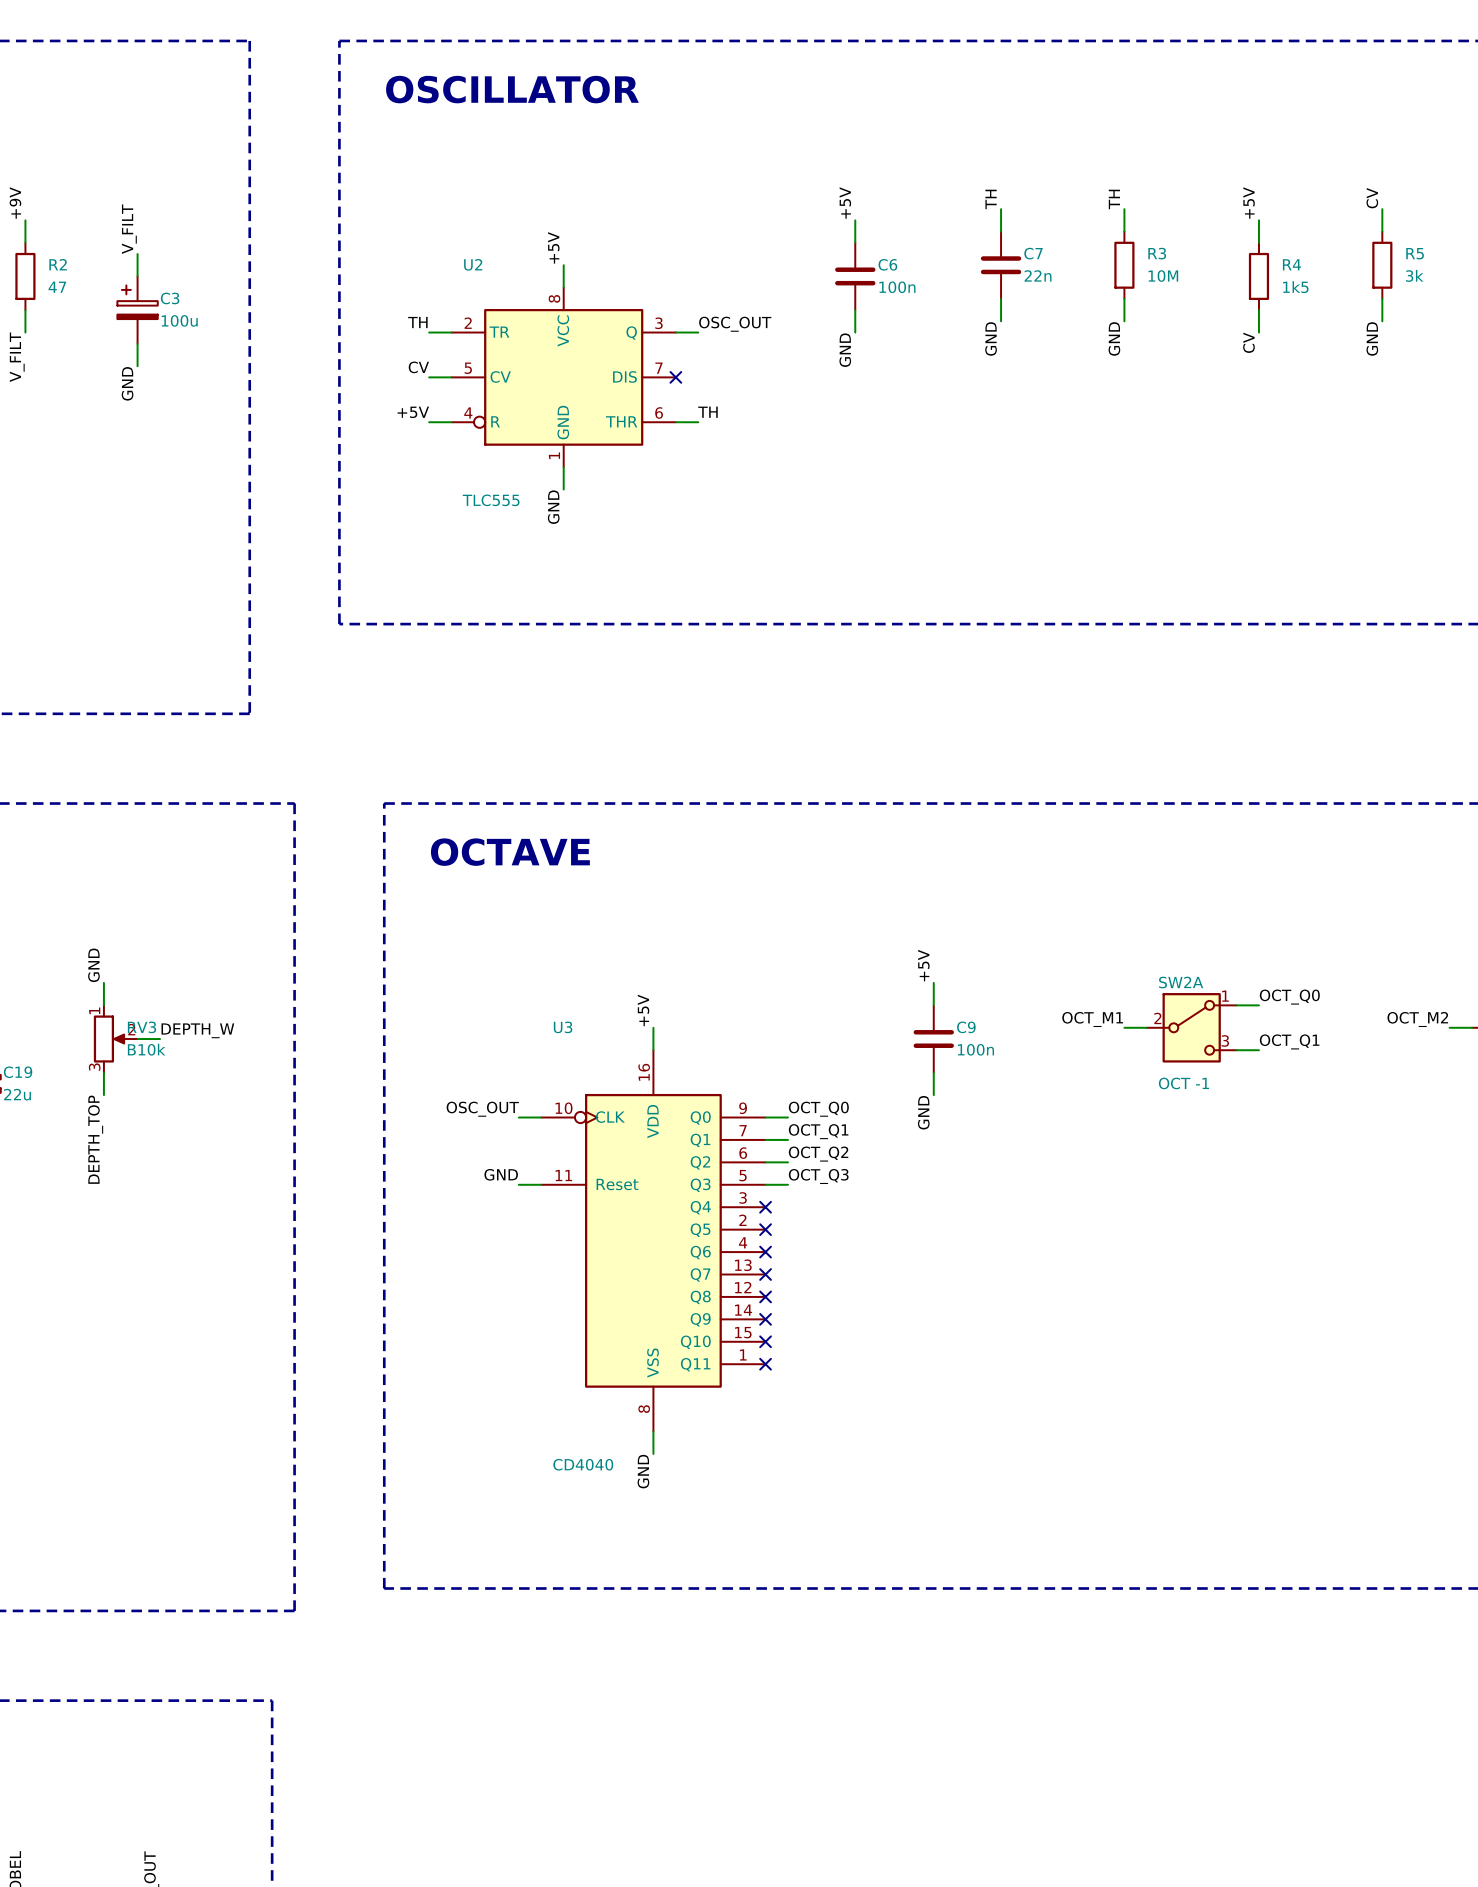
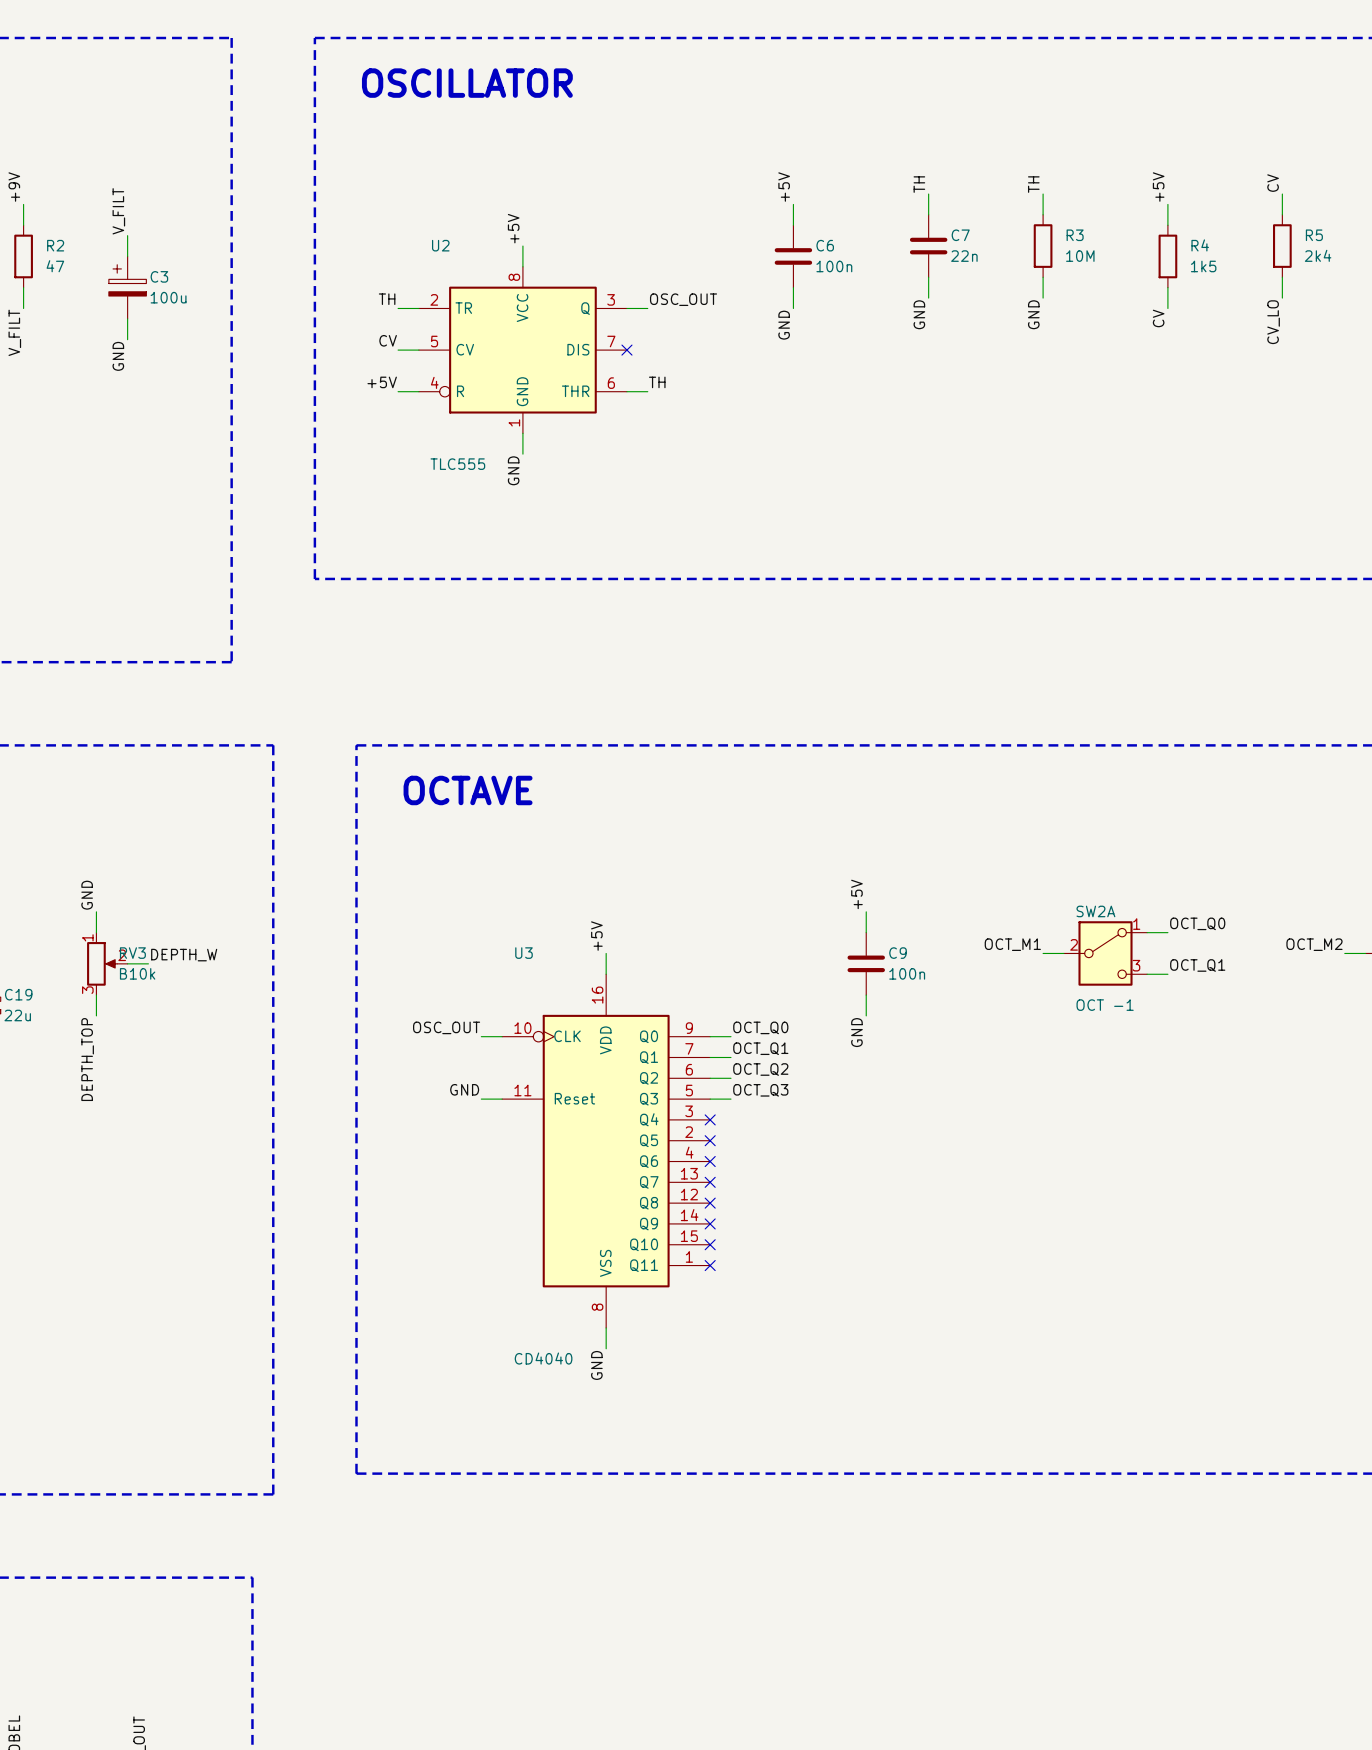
R5 value: 3k (1414, 275) -> 2k4 (1318, 255)
label: GND (1372, 338) -> CV_LO (1273, 322)

